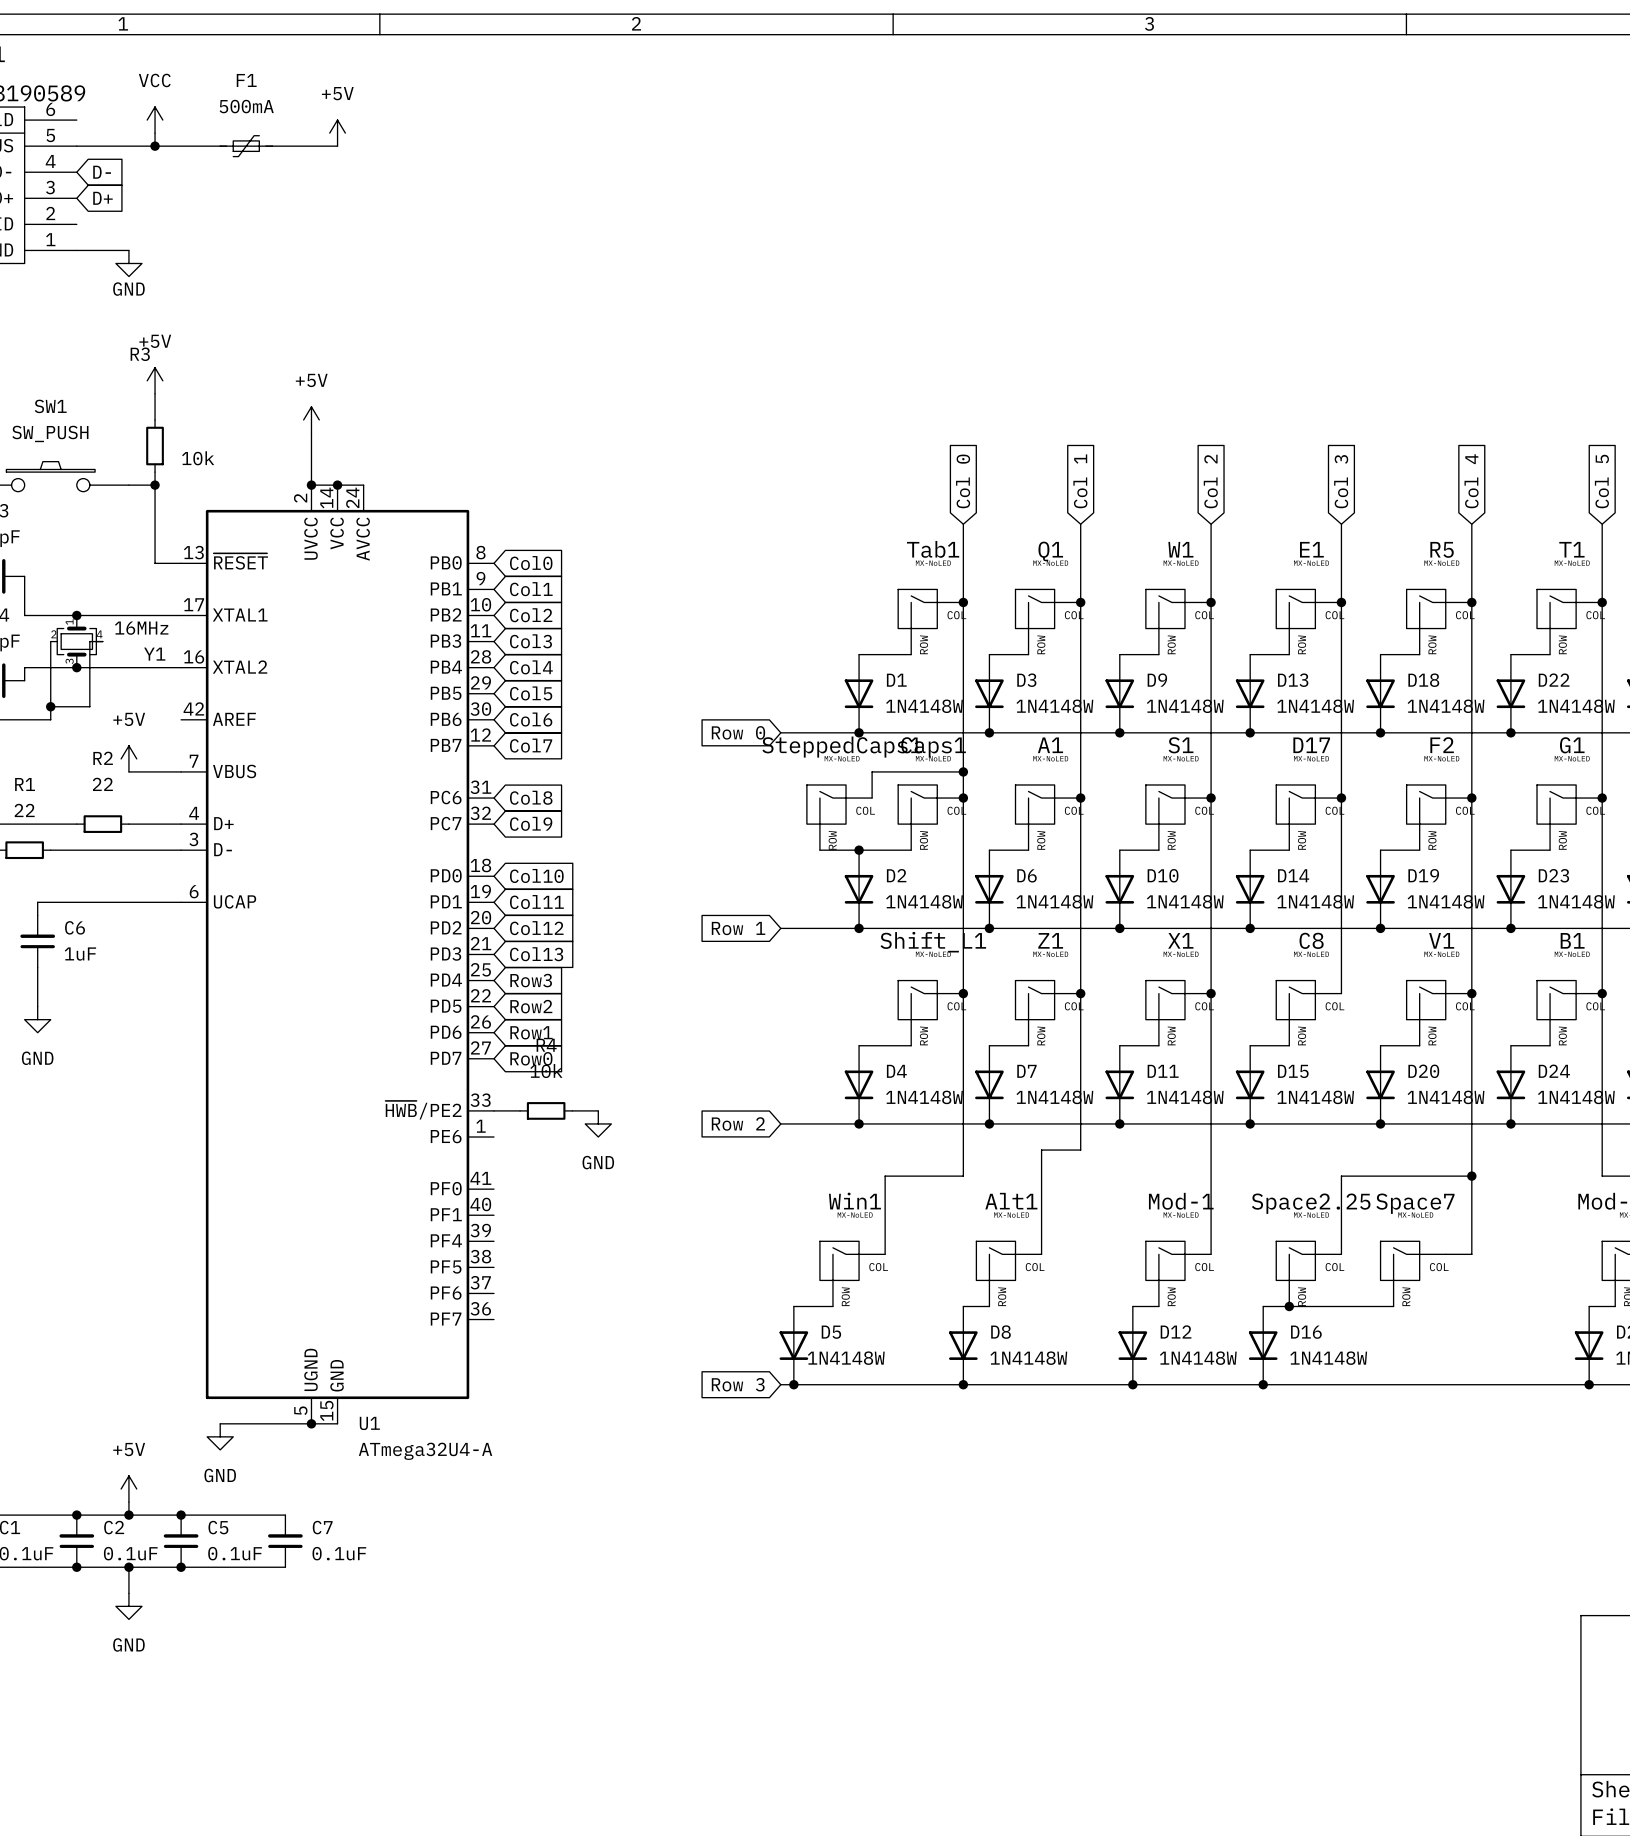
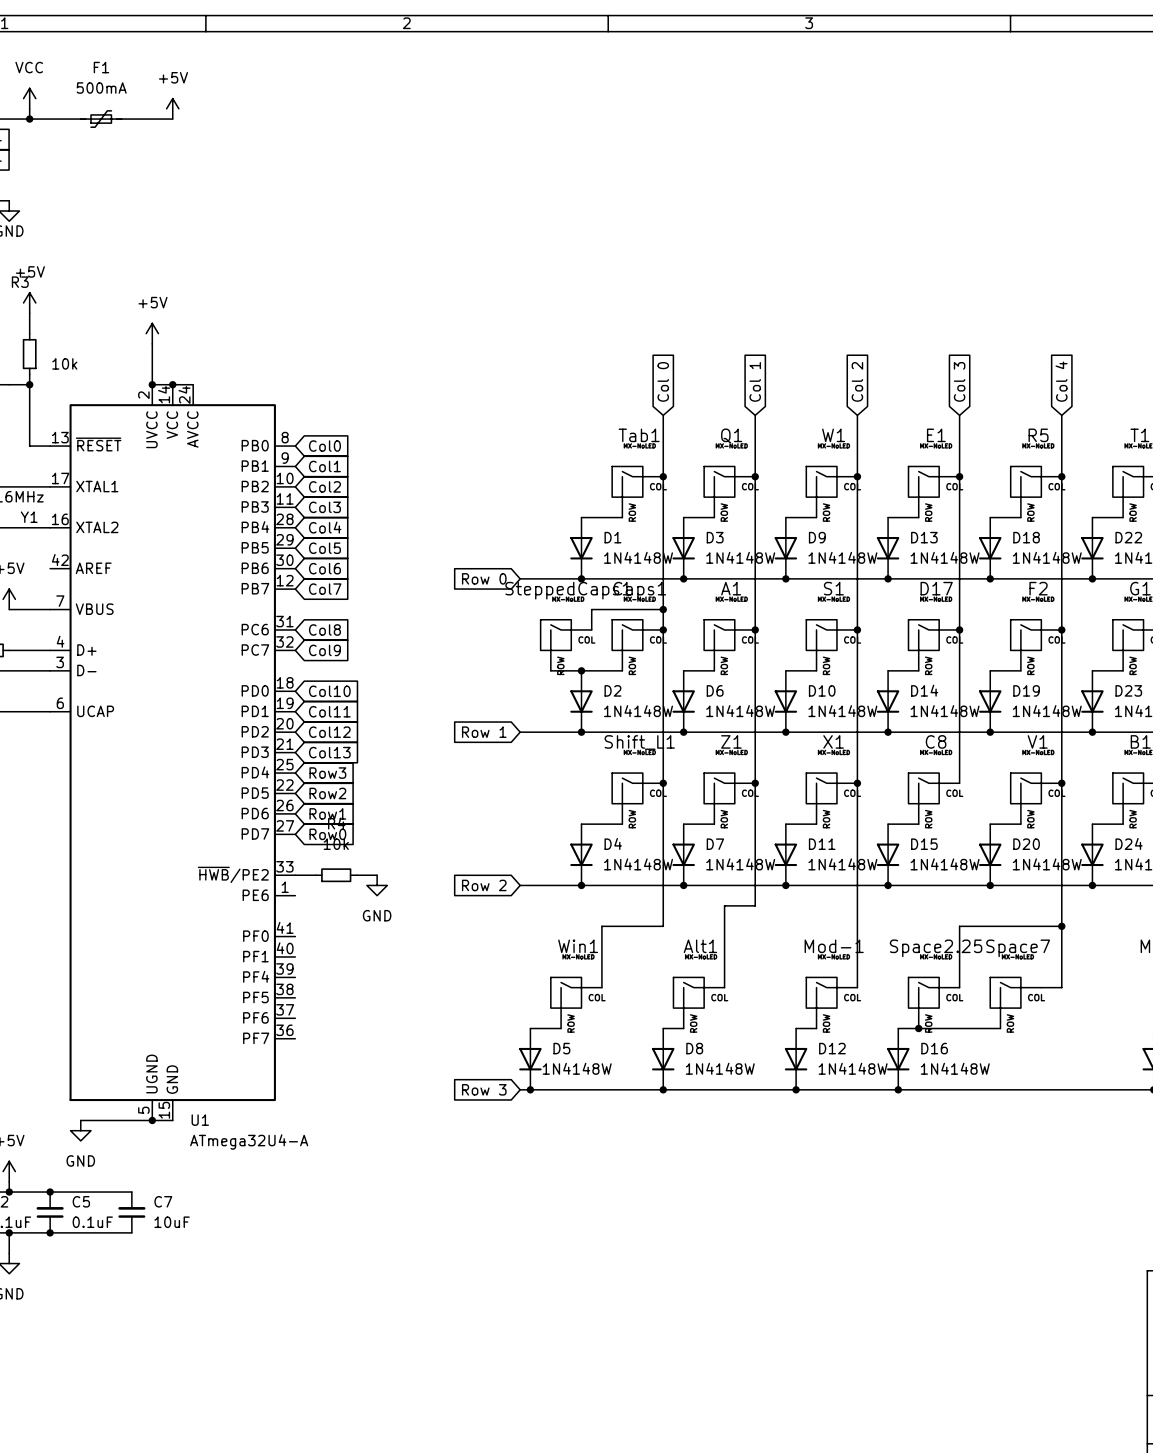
C7 value: 0.1uF (339, 1553) -> 10uF (172, 1222)

